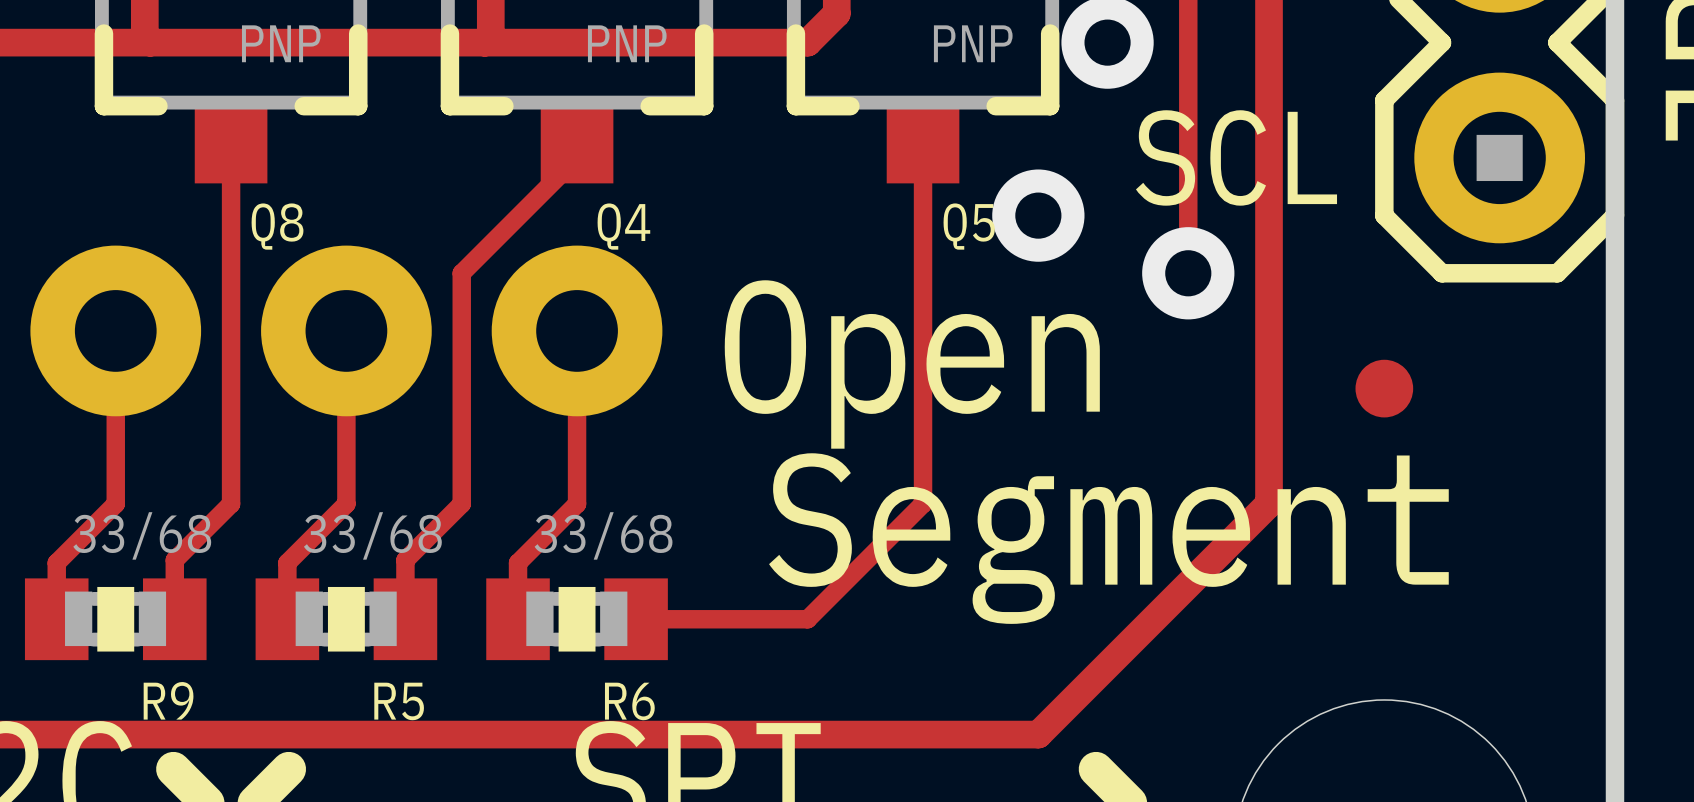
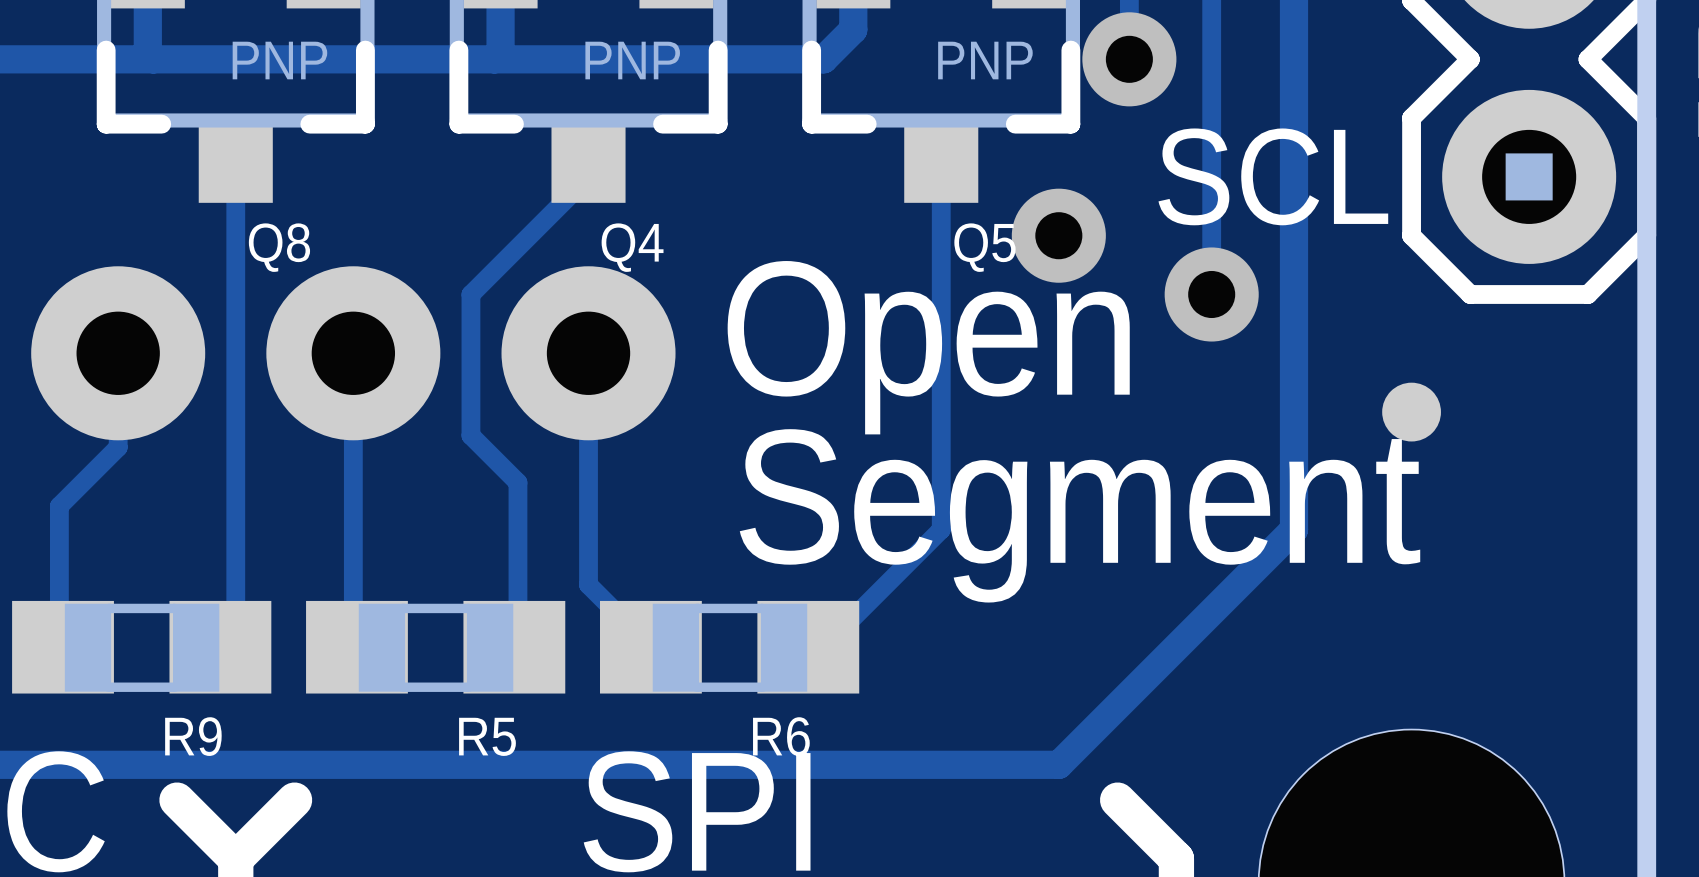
text position: Open (912, 364) -> Open (928, 347)
track: (461, 411) (461, 503) (405, 560) (405, 619) -> (470, 435) (517, 482) (517, 643) (514, 647)
track: (115, 423) (115, 503) (56, 562) (56, 619) -> (118, 447) (59, 506) (59, 643) (63, 647)
track: (231, 503) (174, 560) (174, 619) -> (235, 529) (235, 631) (220, 647)
track: (346, 503) (287, 562) (287, 619) -> (353, 529) (353, 643) (356, 647)
track: (577, 503) (518, 562) (518, 619) -> (588, 529) (588, 584) (650, 647)
R9 value: 33/68 (142, 535) -> none
R5 value: 33/68 (372, 535) -> none
R6 value: 33/68 (603, 535) -> none
text position: Segment (1108, 538) -> Segment (1080, 515)
R9 footprint: [24, 578, 207, 661] -> [12, 600, 272, 694]
R5 footprint: [255, 578, 438, 661] -> [306, 600, 566, 694]
R6 footprint: [486, 578, 668, 661] -> [599, 600, 860, 694]
track: (636, 619) (792, 619) -> none

